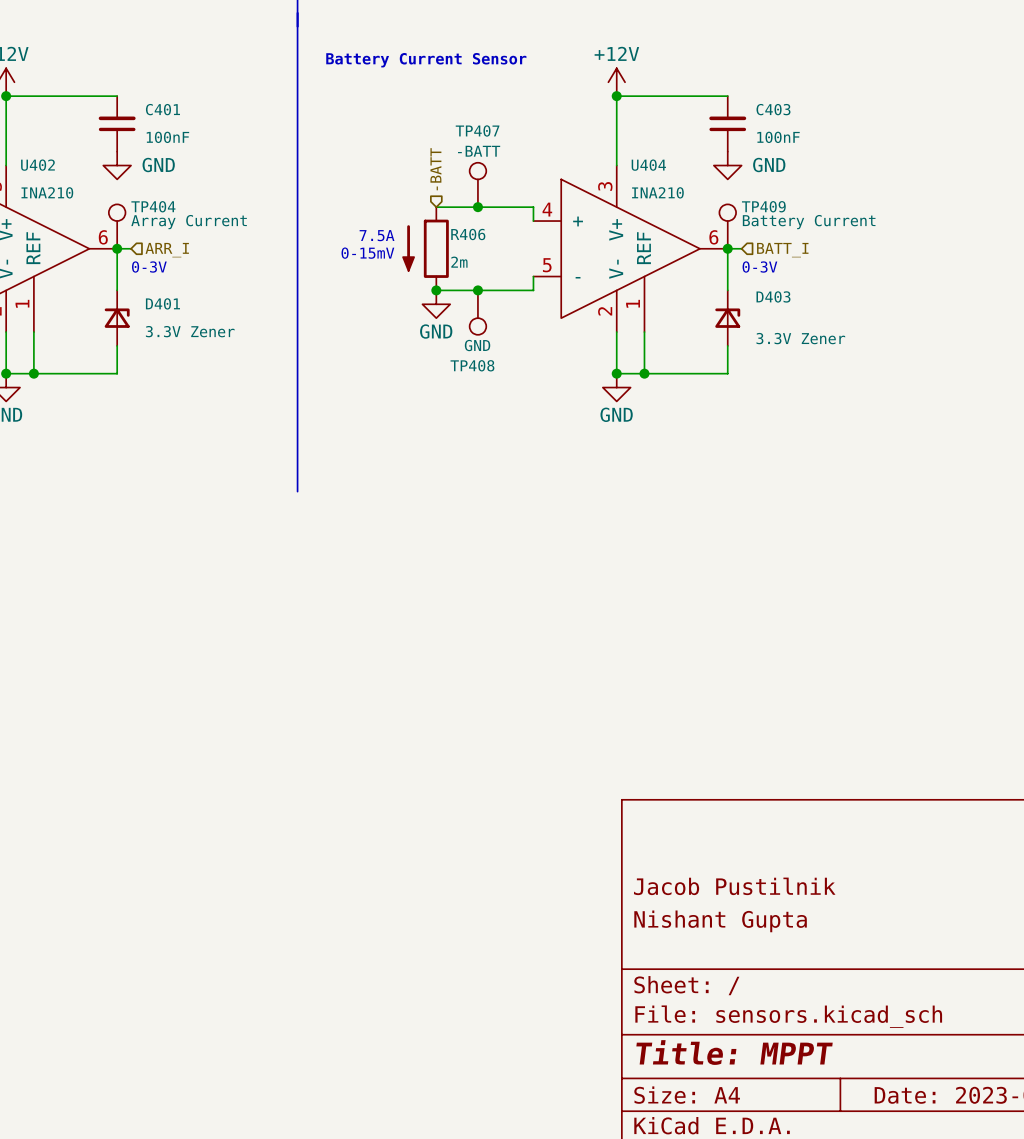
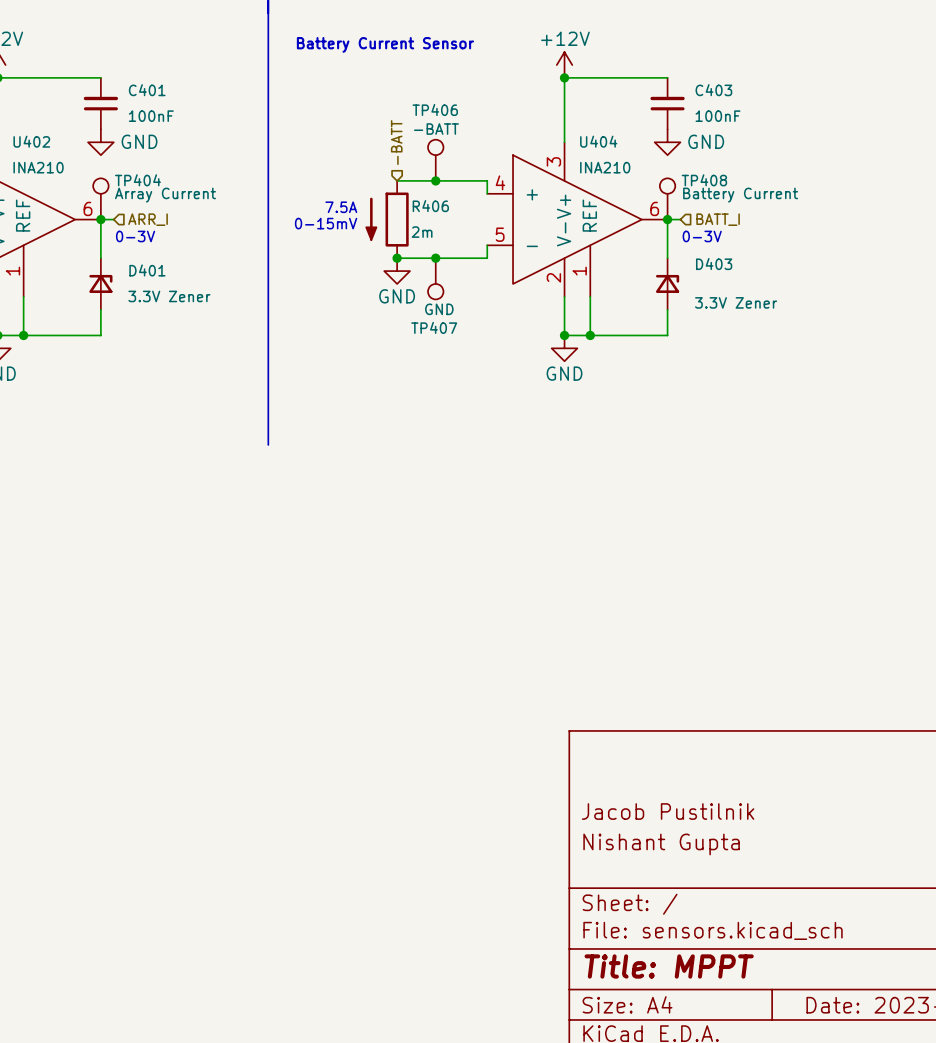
TP407 name: TP407 (477, 130) -> TP406 (435, 109)
TP409 name: TP409 (763, 206) -> TP408 (704, 180)
TP408 name: TP408 (472, 365) -> TP407 (434, 327)

